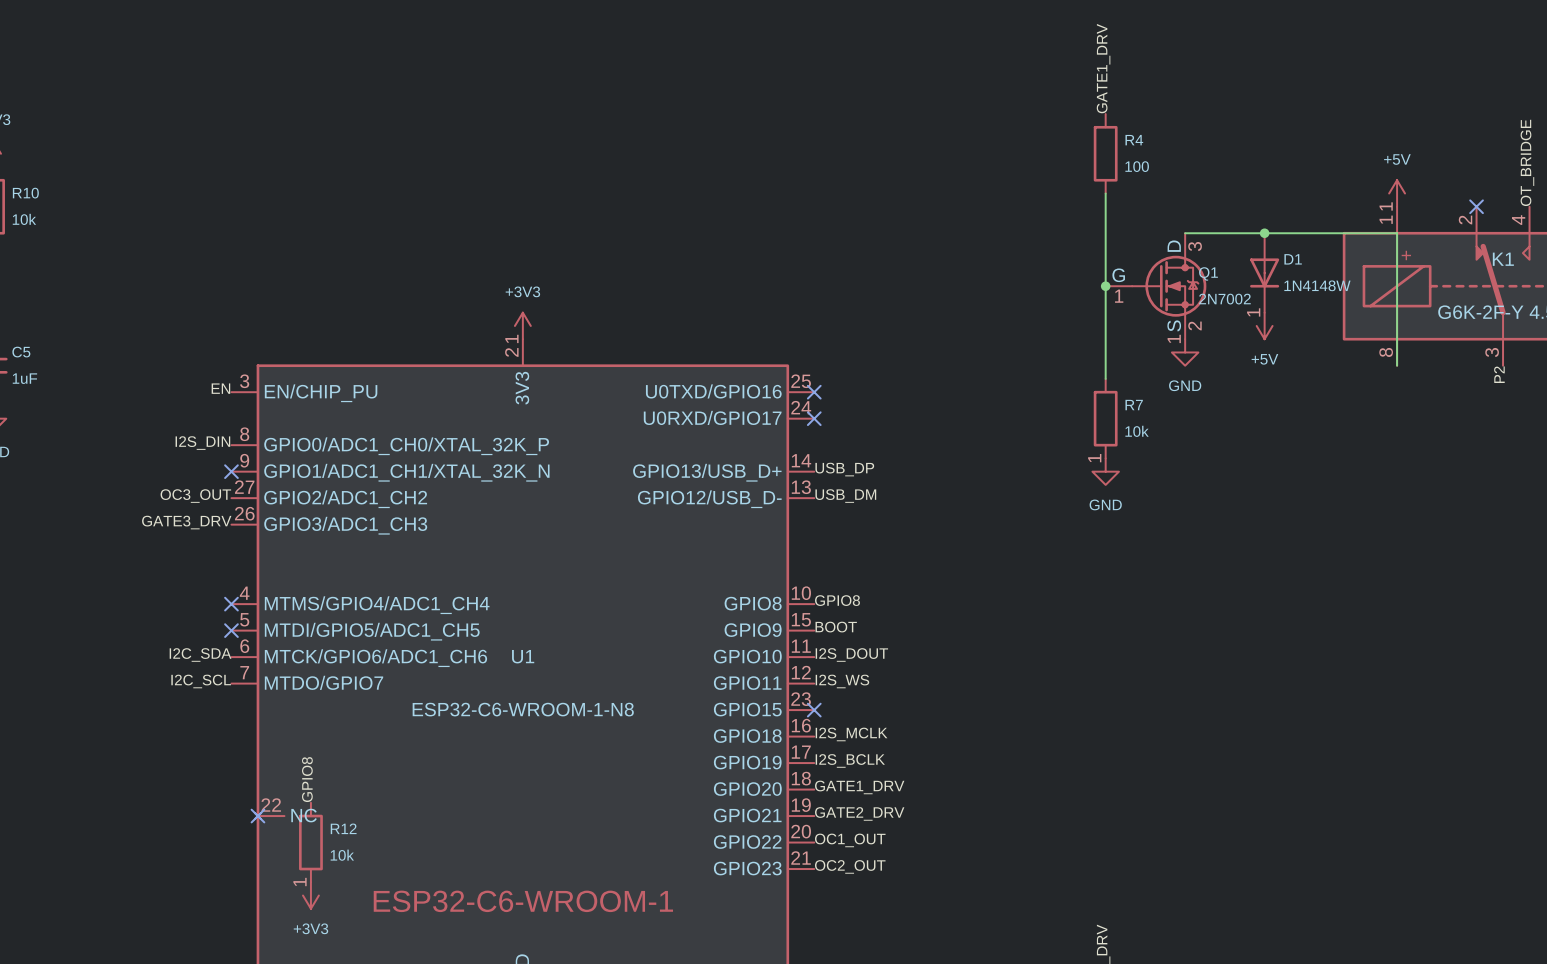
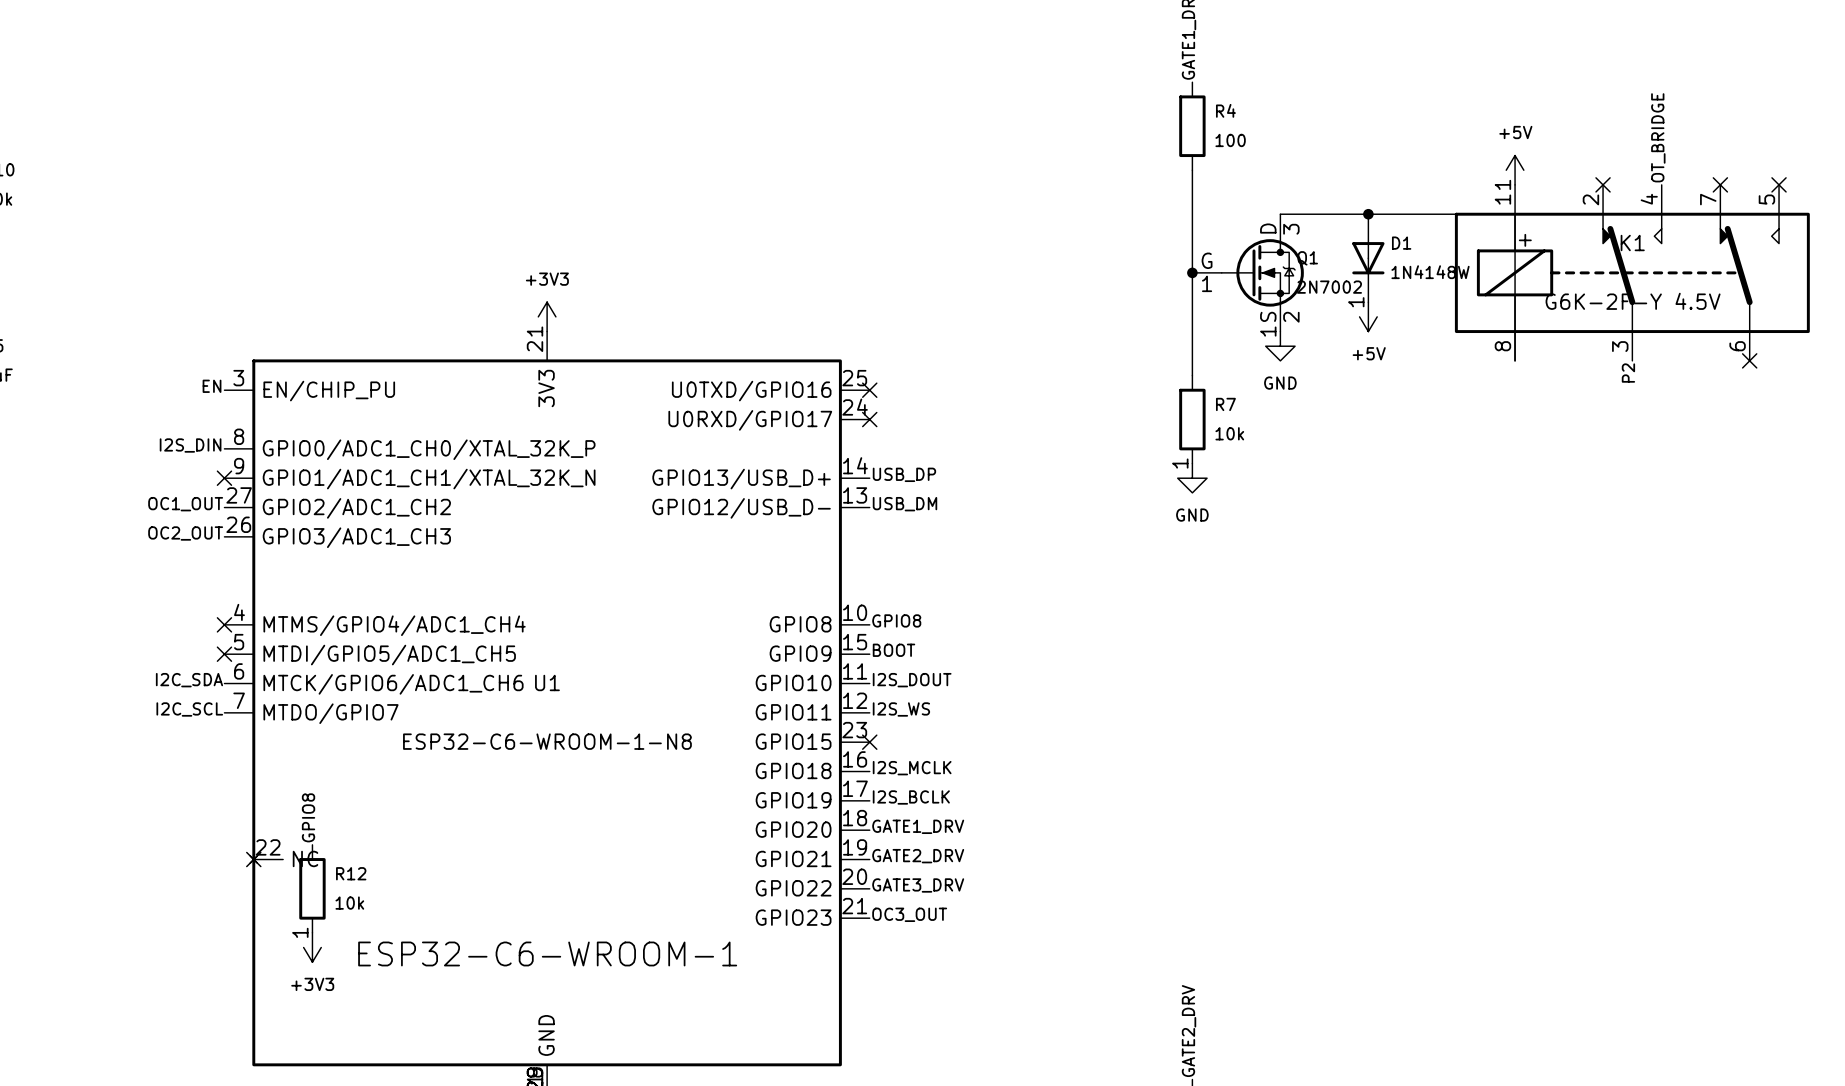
label: OC3_OUT (195, 496) -> OC1_OUT (185, 504)
label: GATE3_DRV (186, 522) -> OC2_OUT (185, 533)
label: OC1_OUT (850, 840) -> GATE3_DRV (918, 885)
label: OC2_OUT (850, 866) -> OC3_OUT (909, 914)

